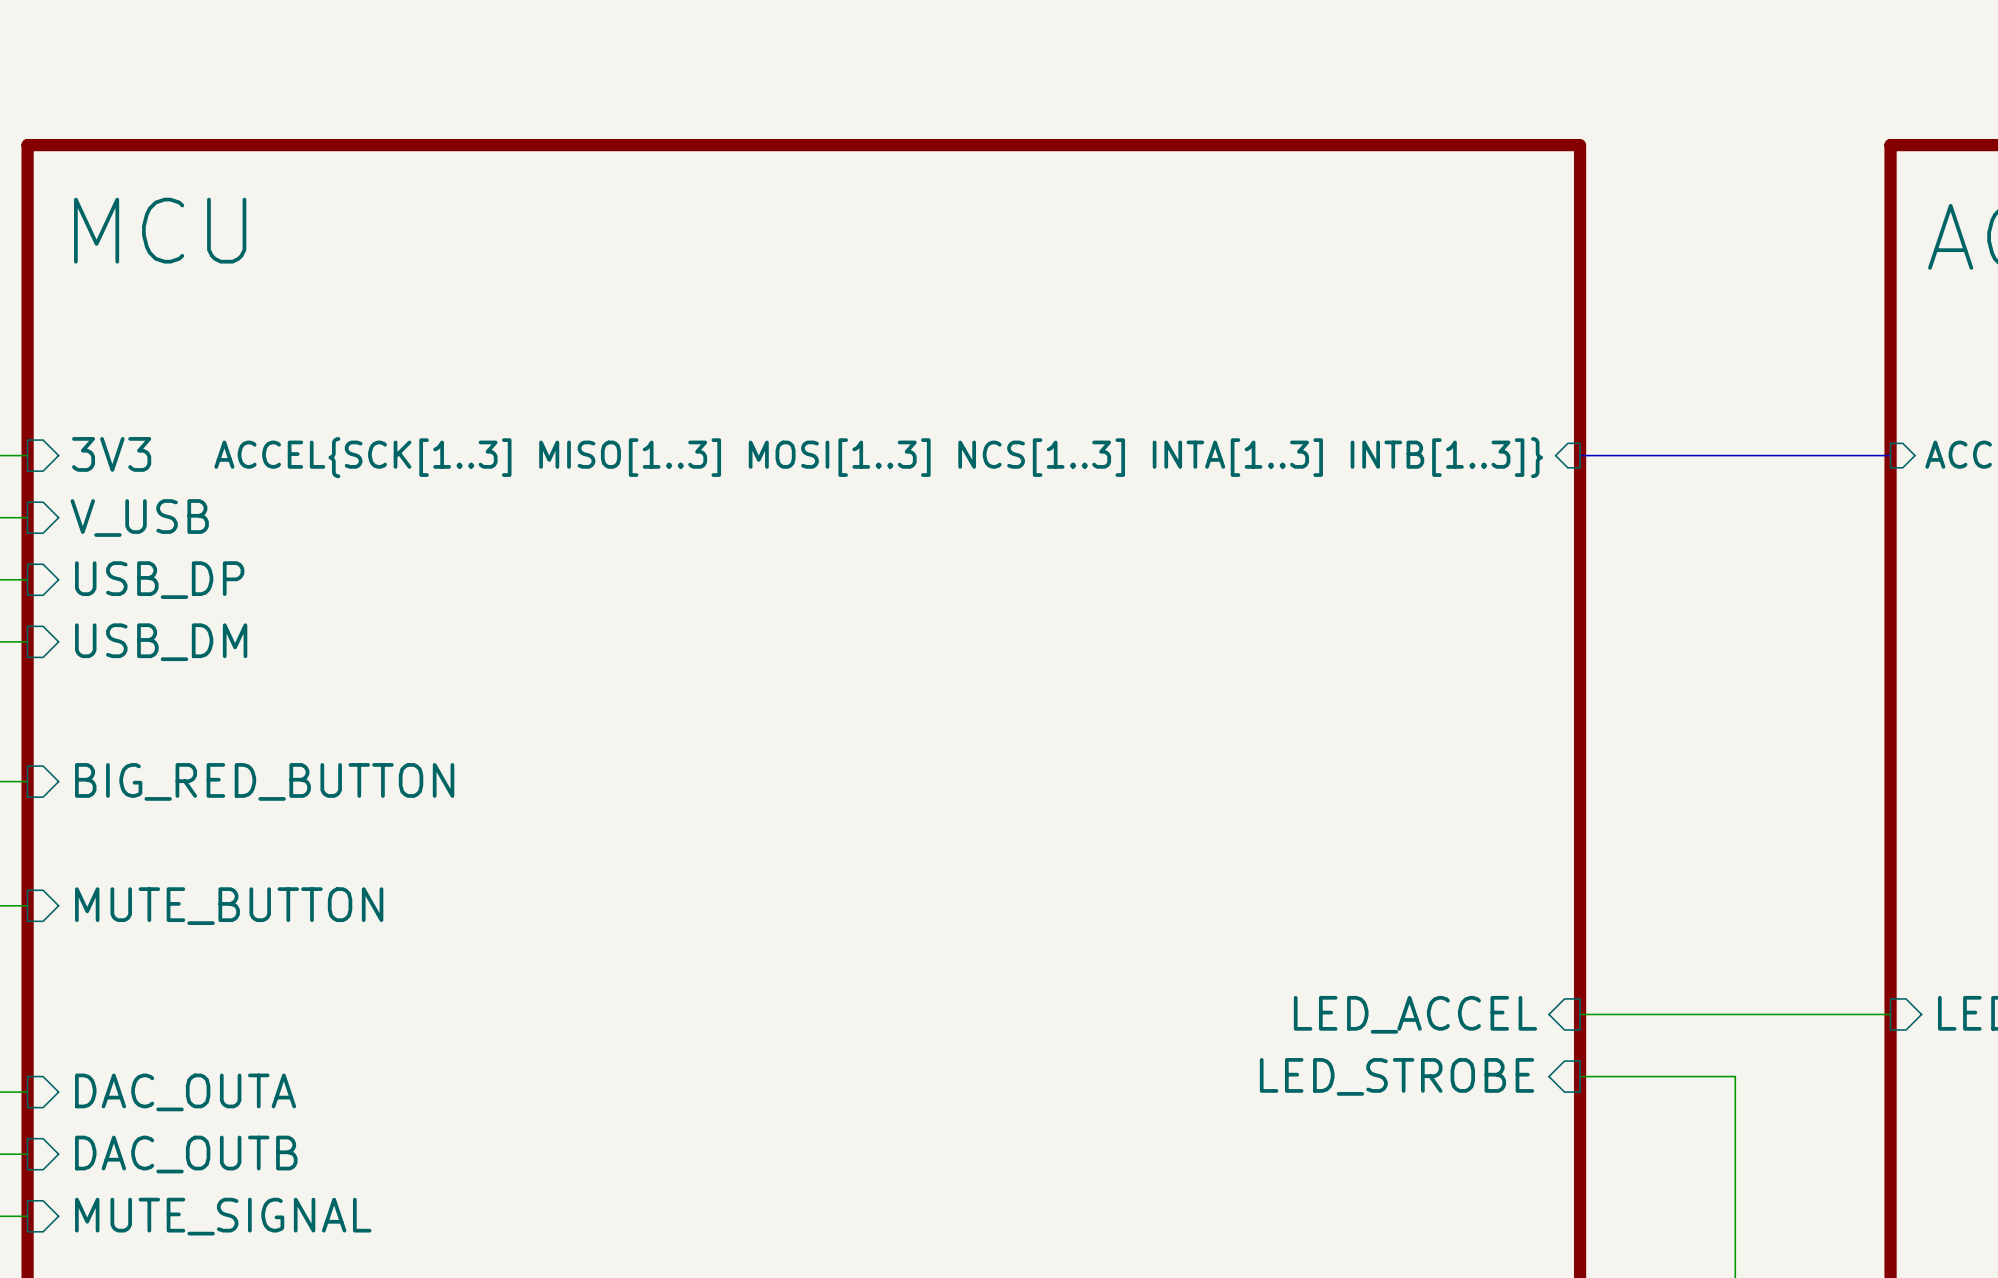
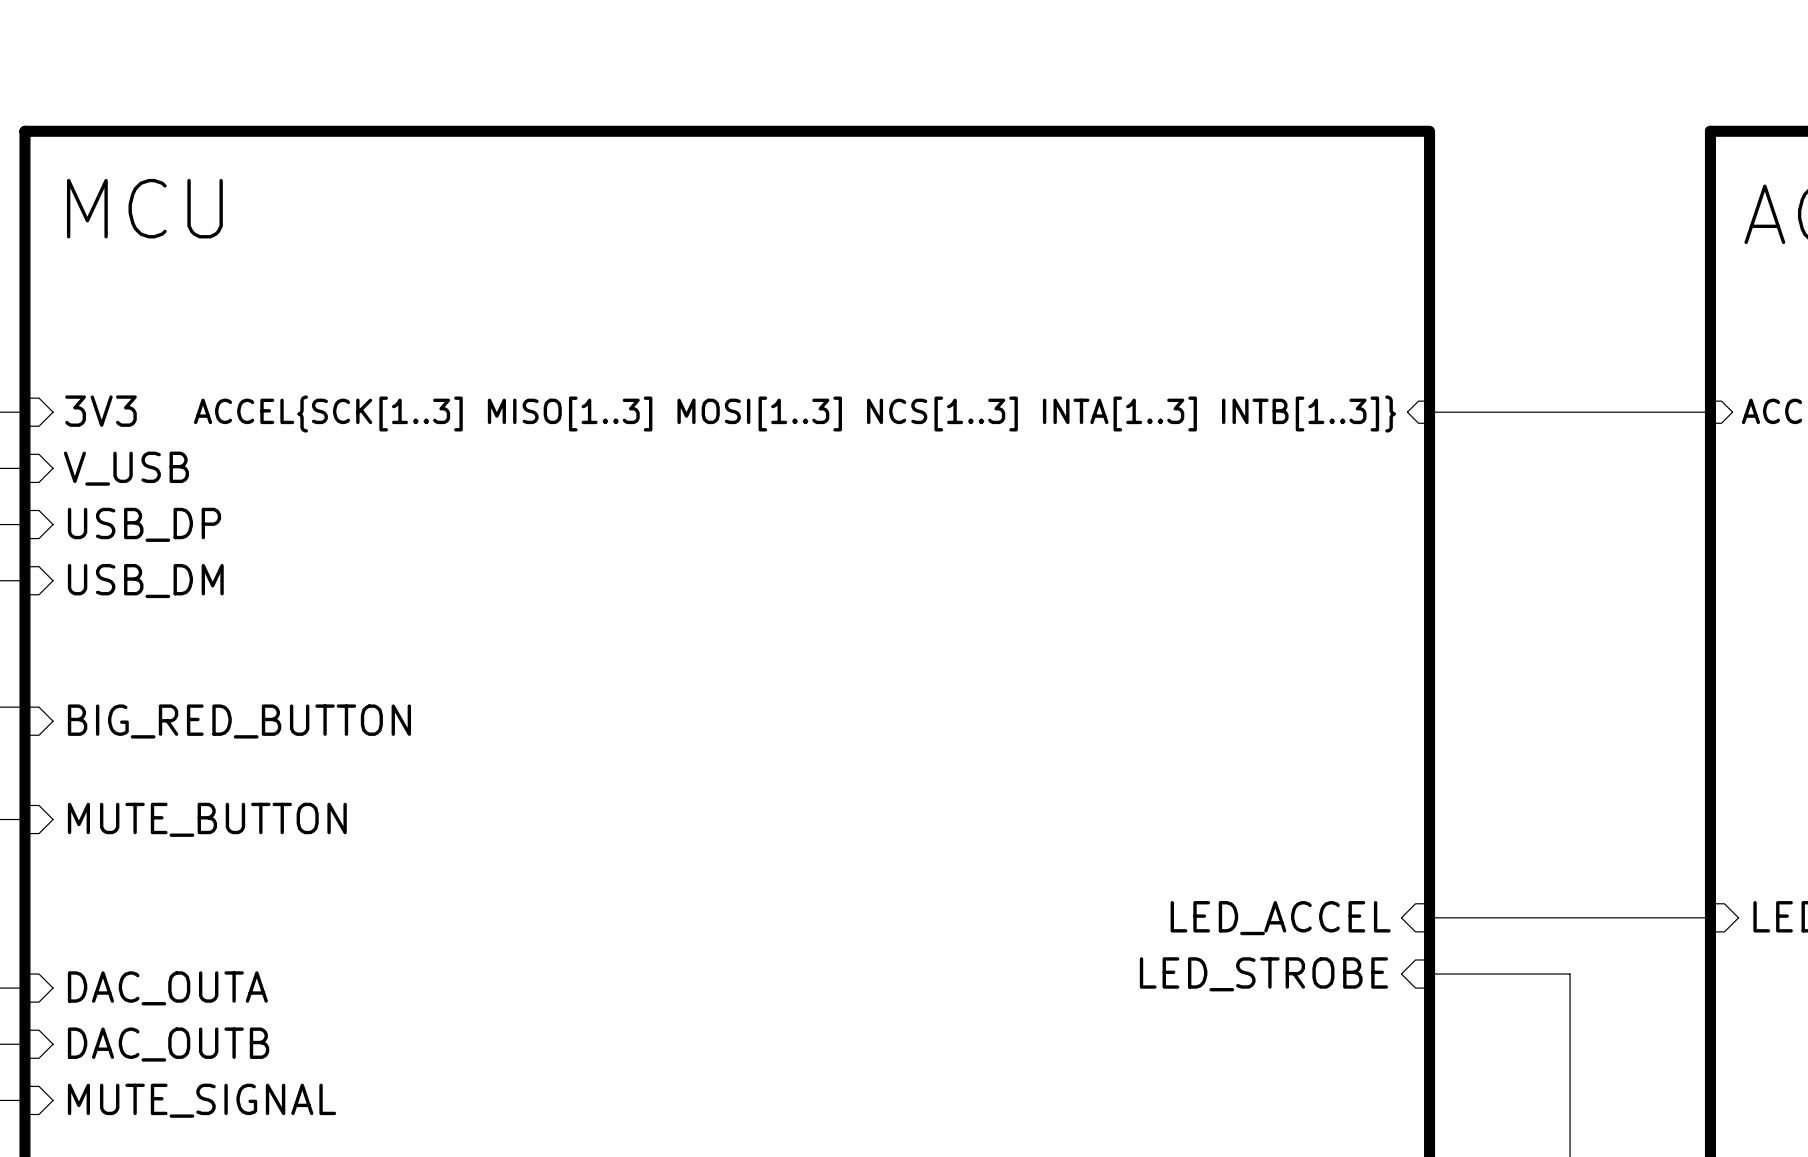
sheet pin position: BIG_RED_BUTTON (264, 781) -> BIG_RED_BUTTON (239, 721)

